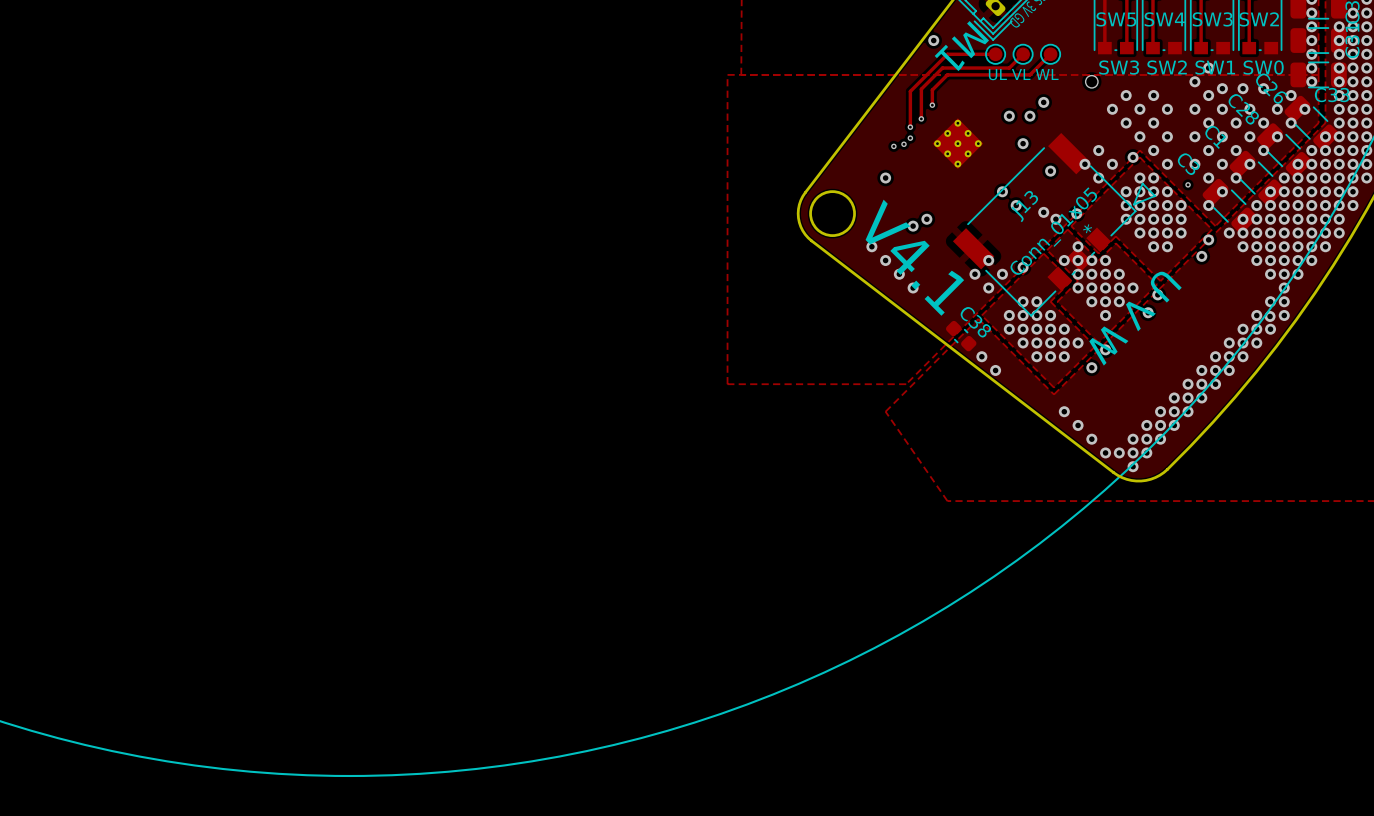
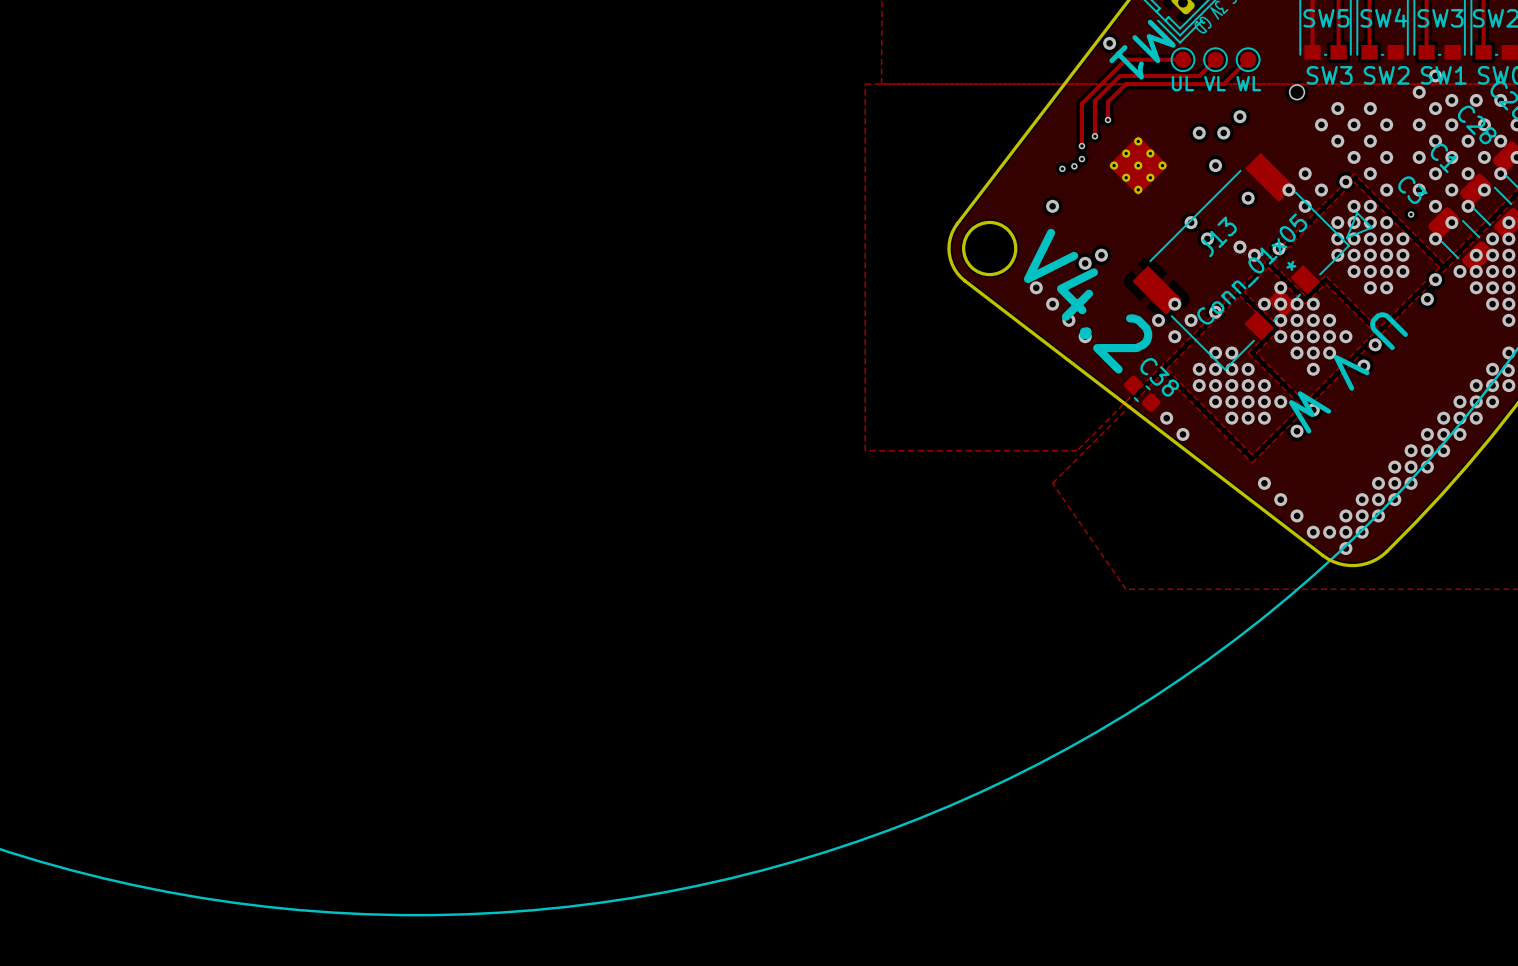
text: V4.1 (914, 257) -> V4.2 (1088, 301)

